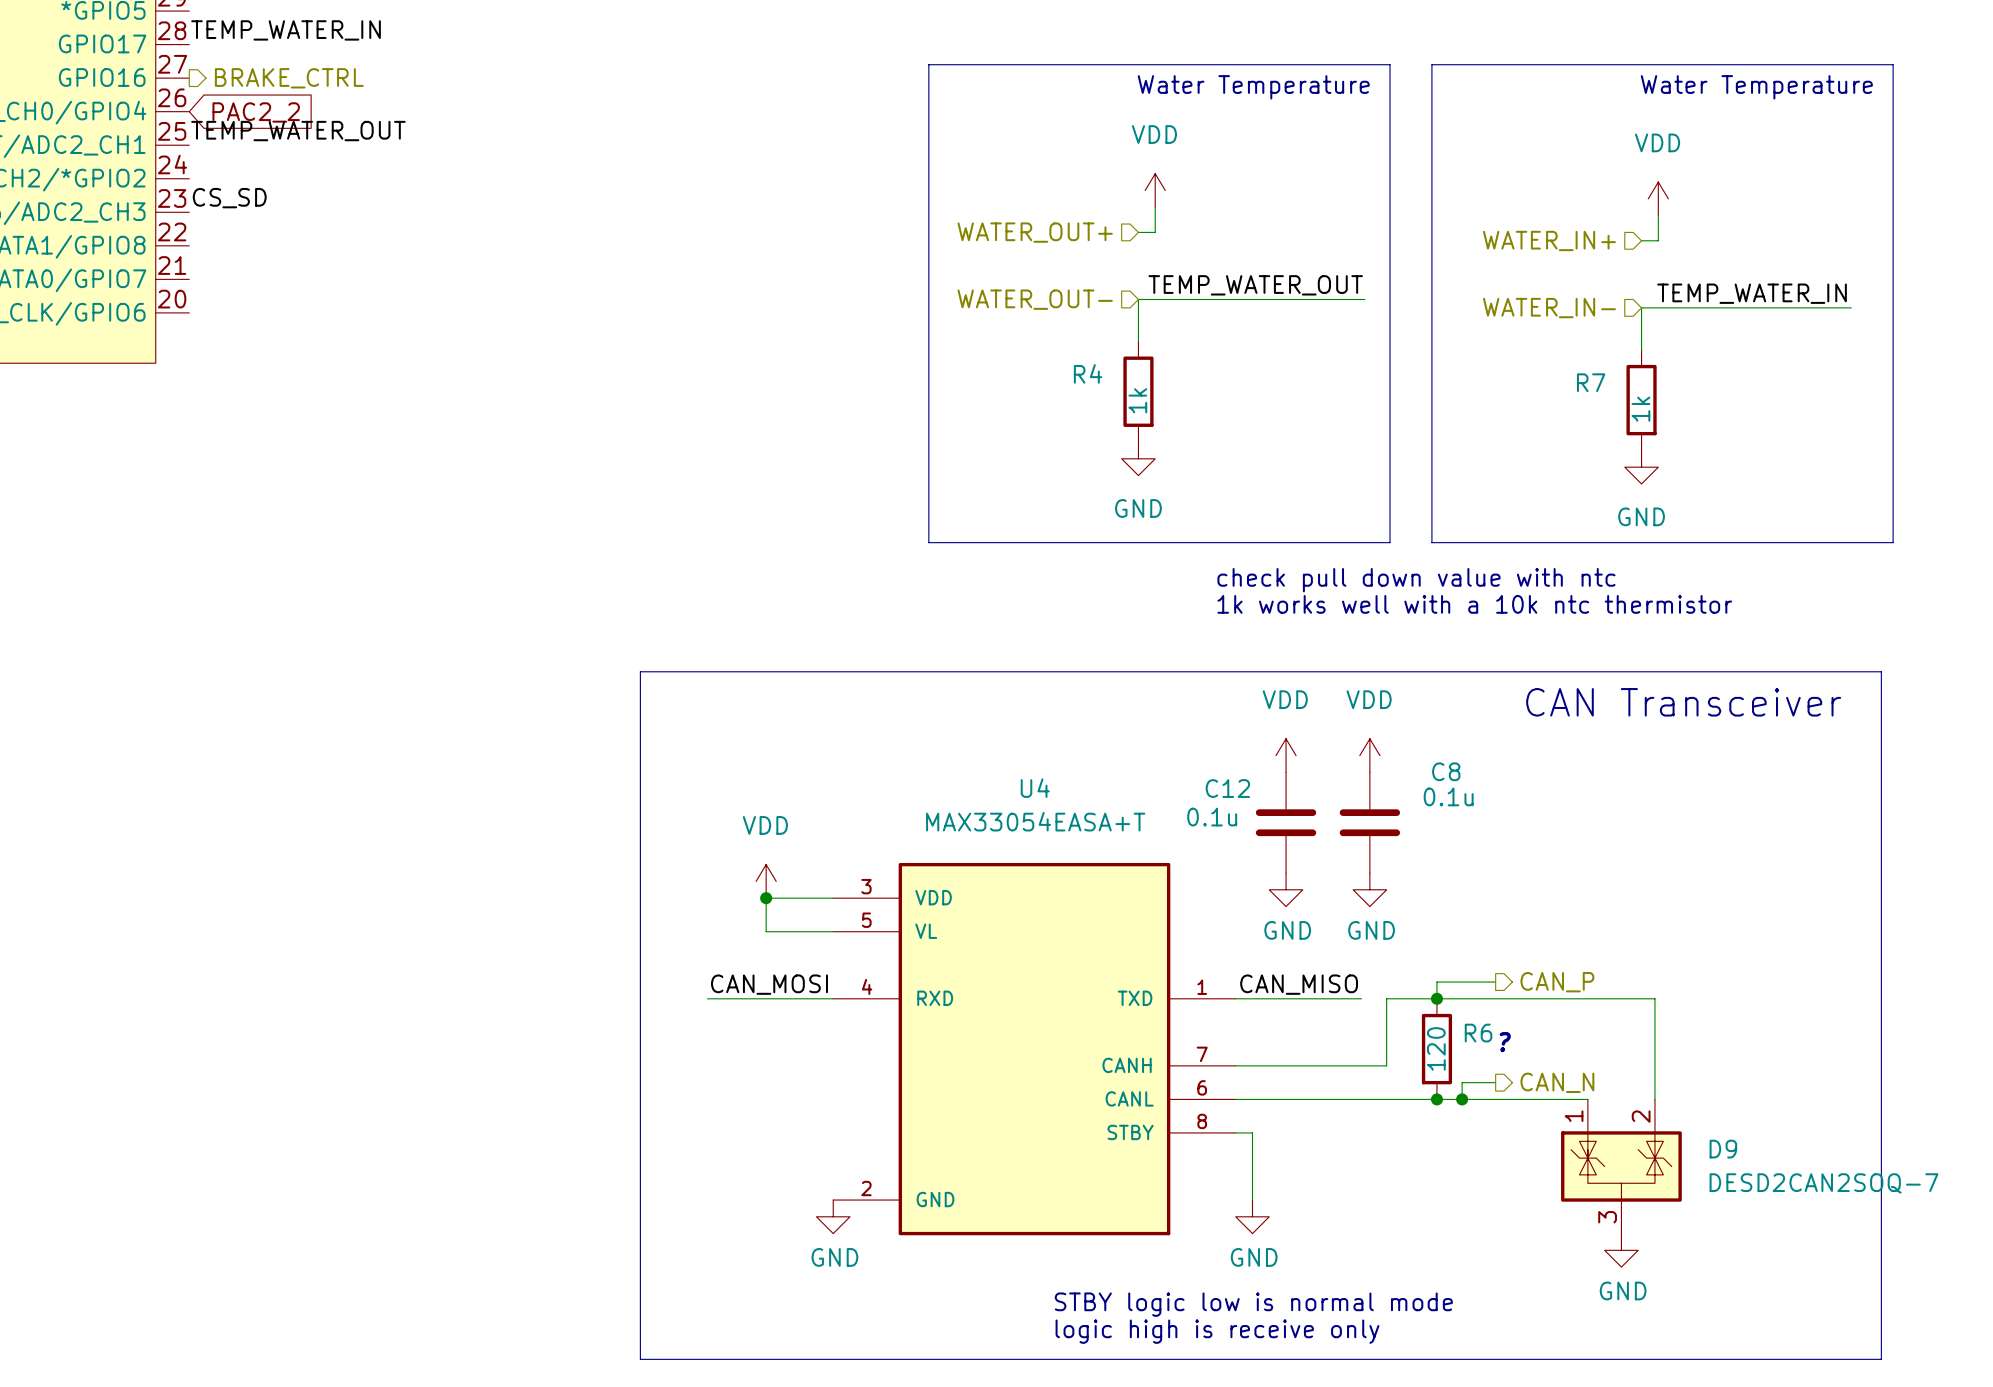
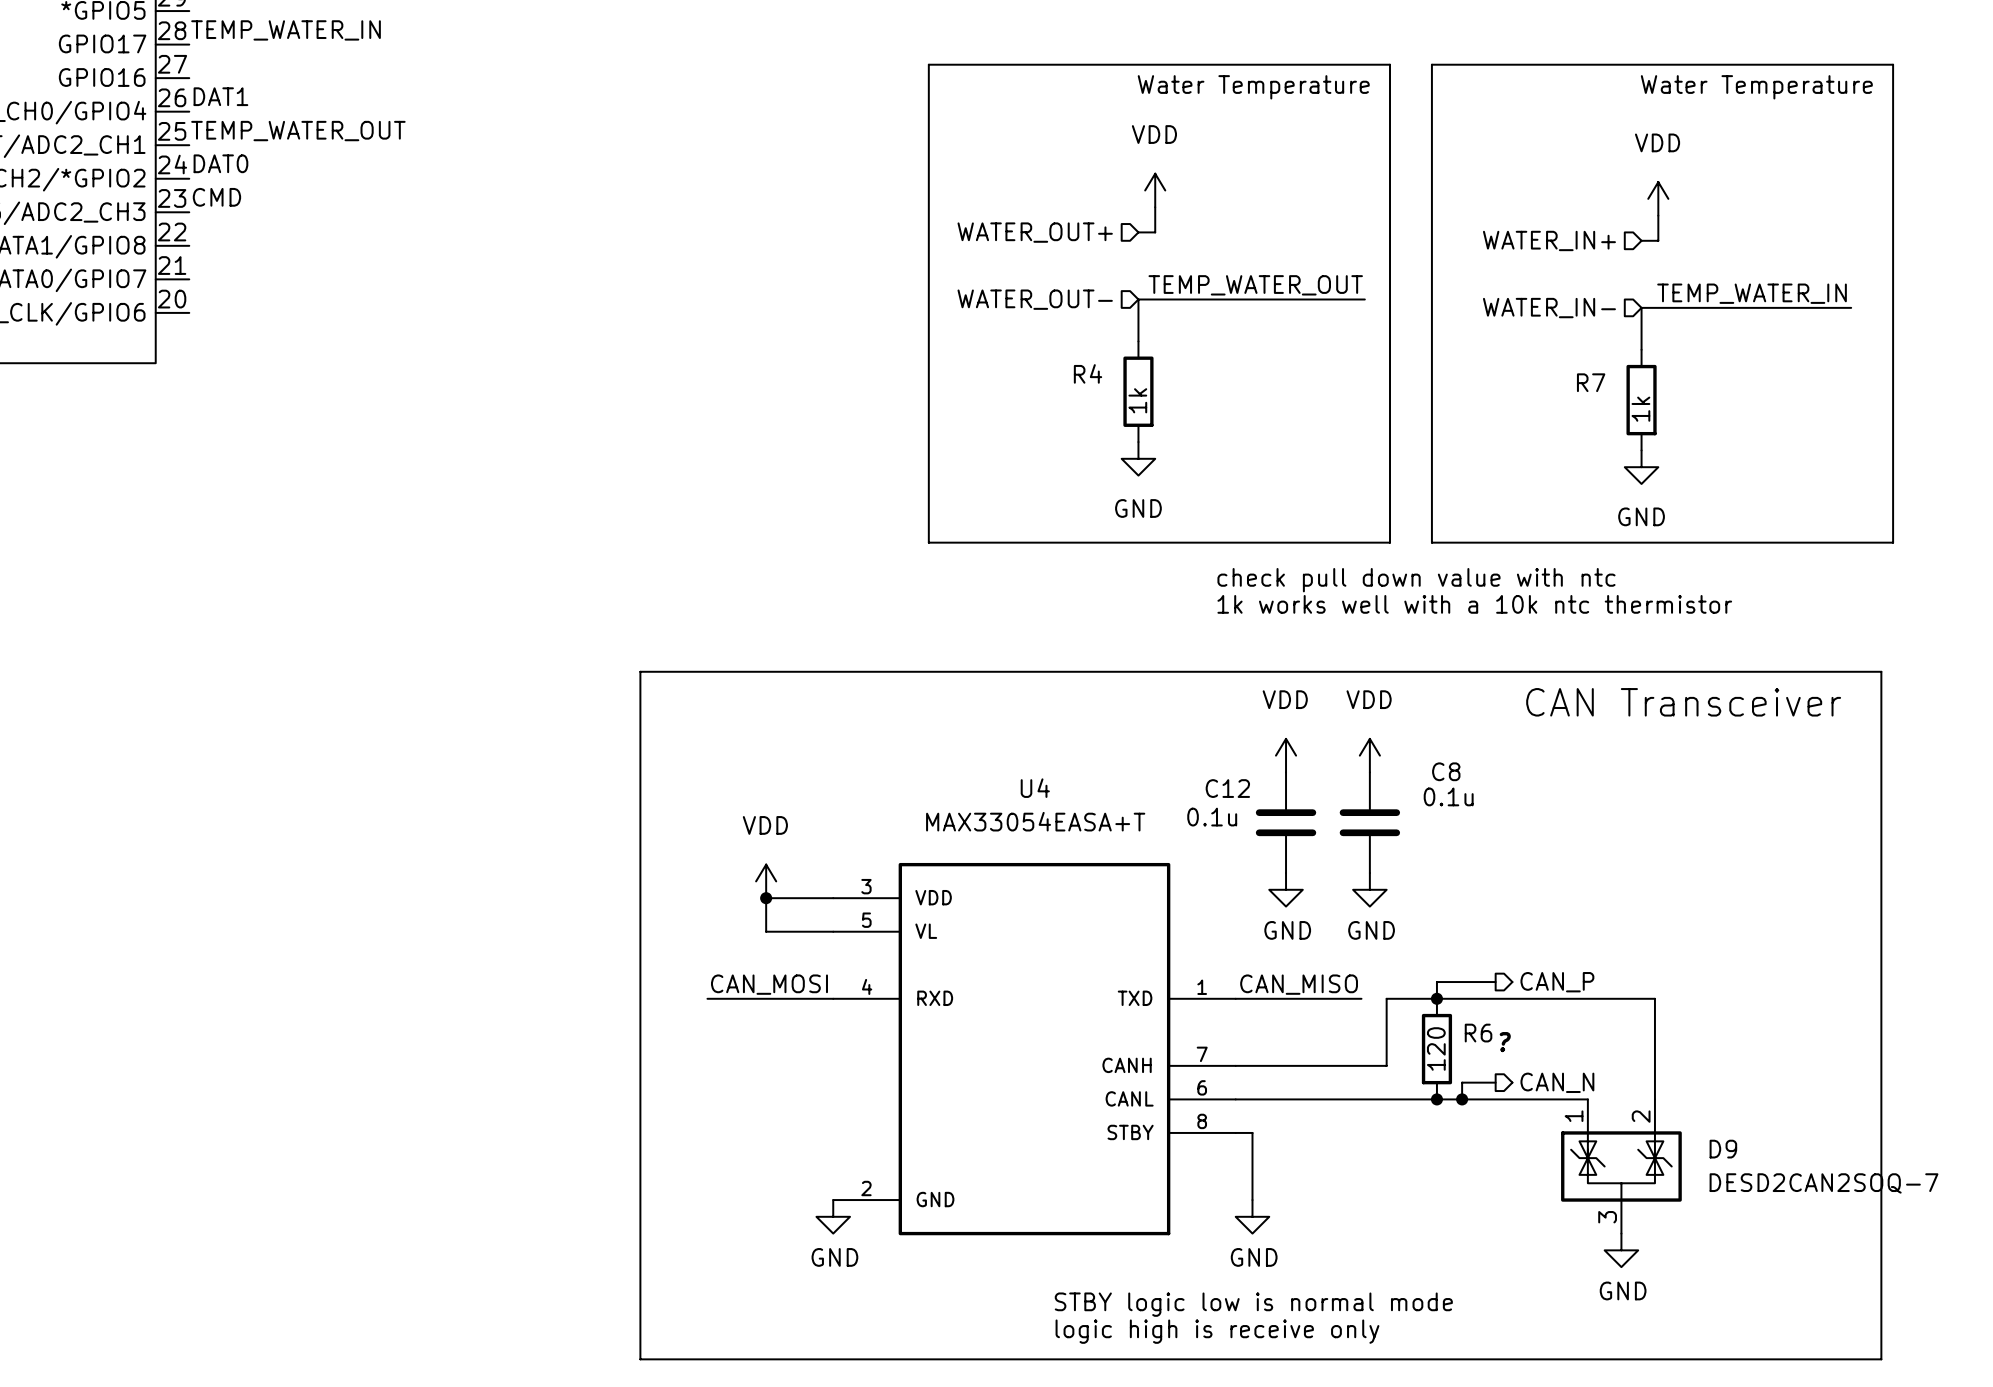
hierarchical label: BRAKE_CTRL (289, 78) -> none
label: none -> DAT1 (220, 96)
global label: PAC2_2 (256, 112) -> none
label: none -> DAT0 (220, 163)
label: CS_SD (229, 198) -> CMD (216, 197)

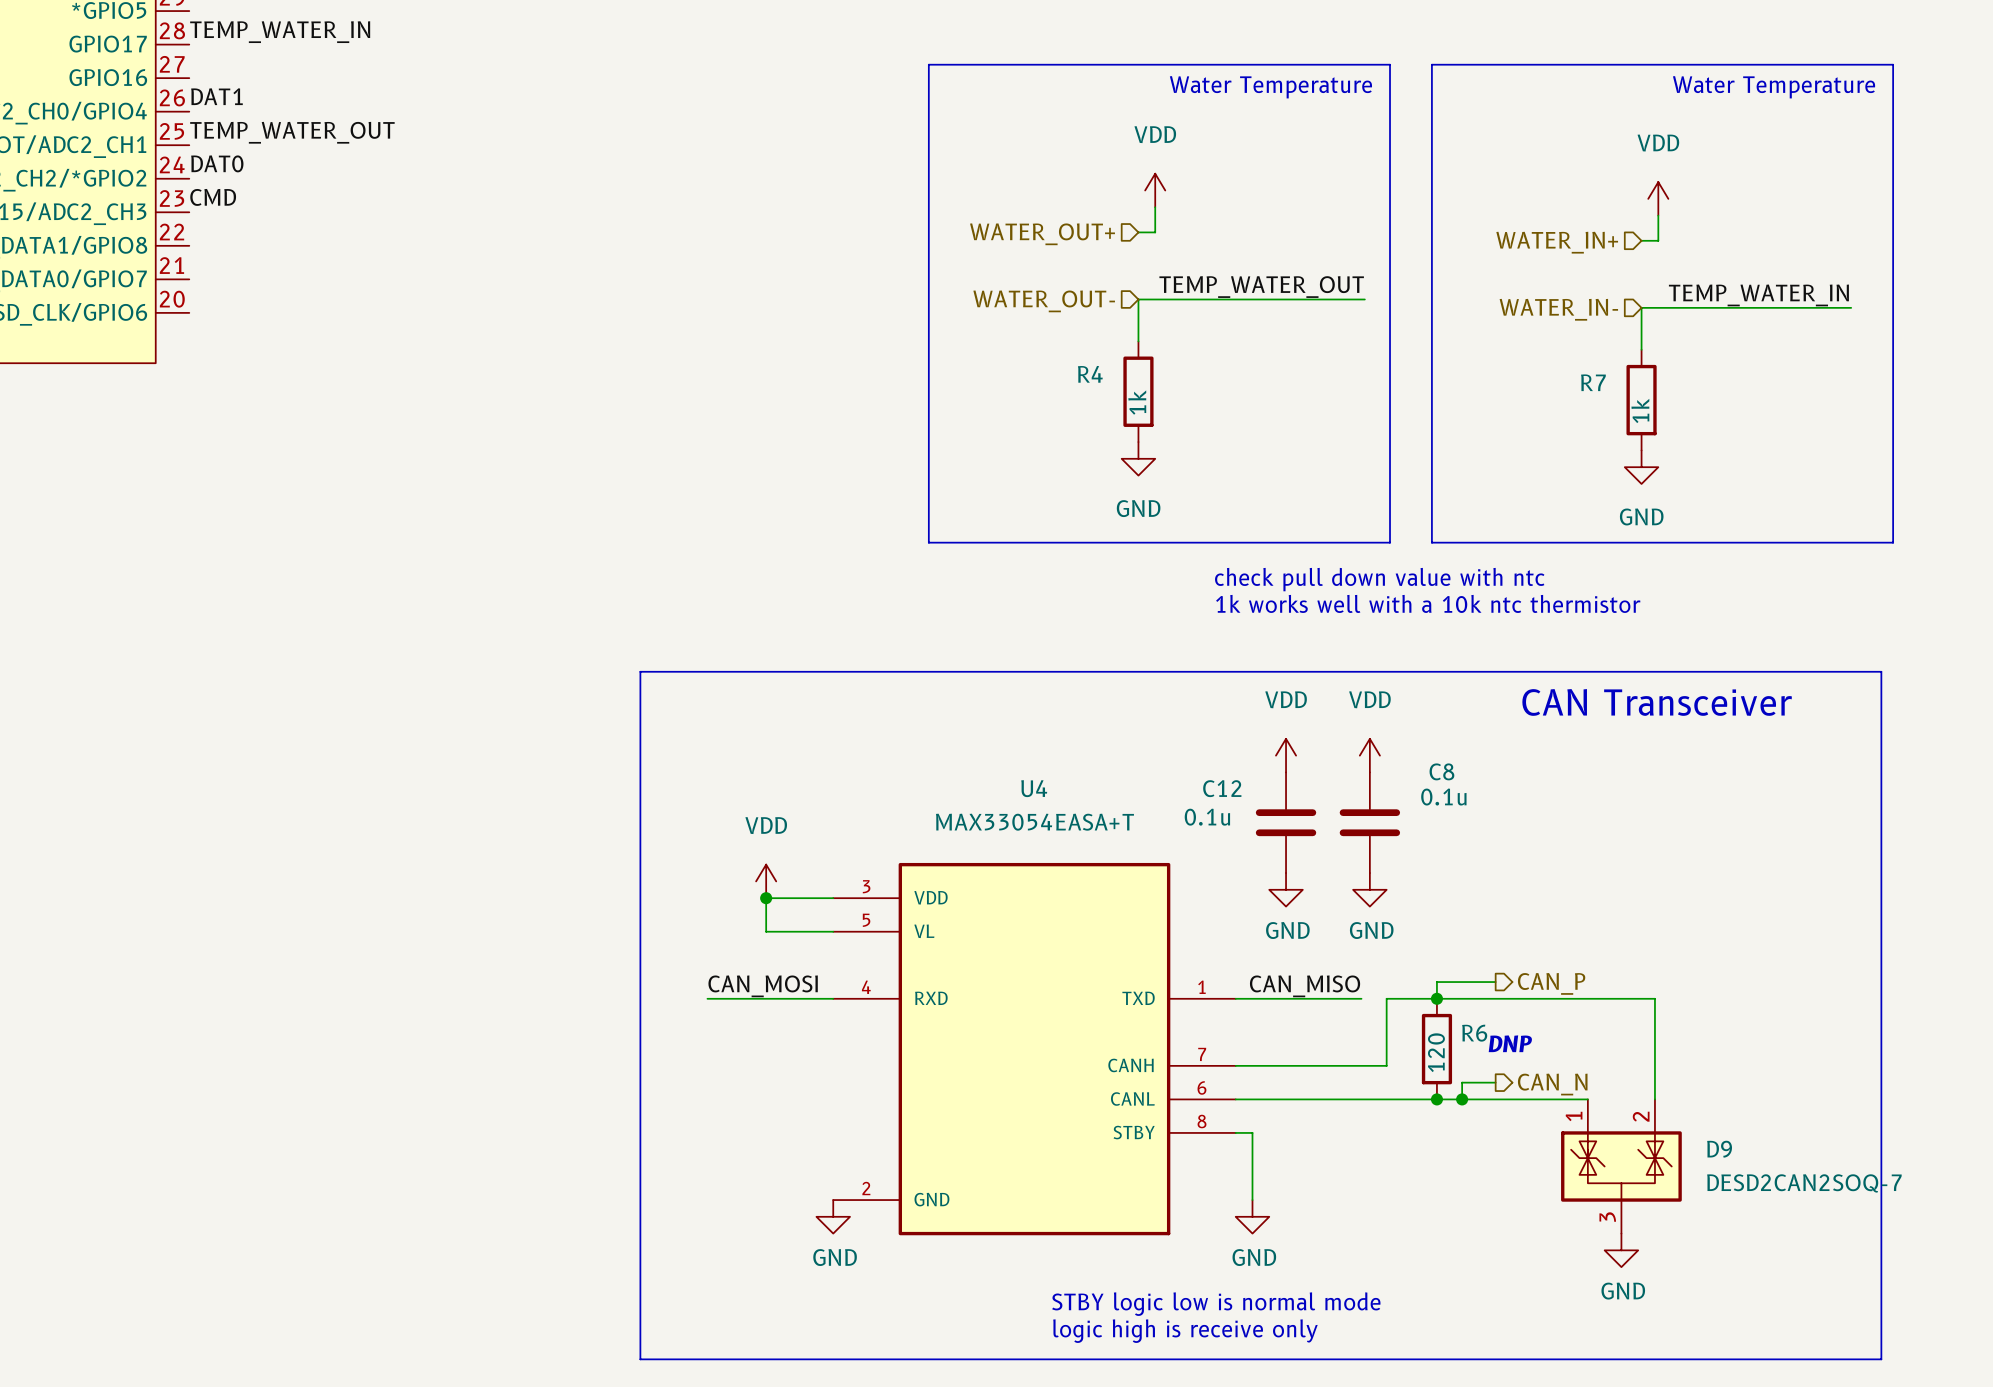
text: ? (1505, 1042) -> DNP (1510, 1043)

